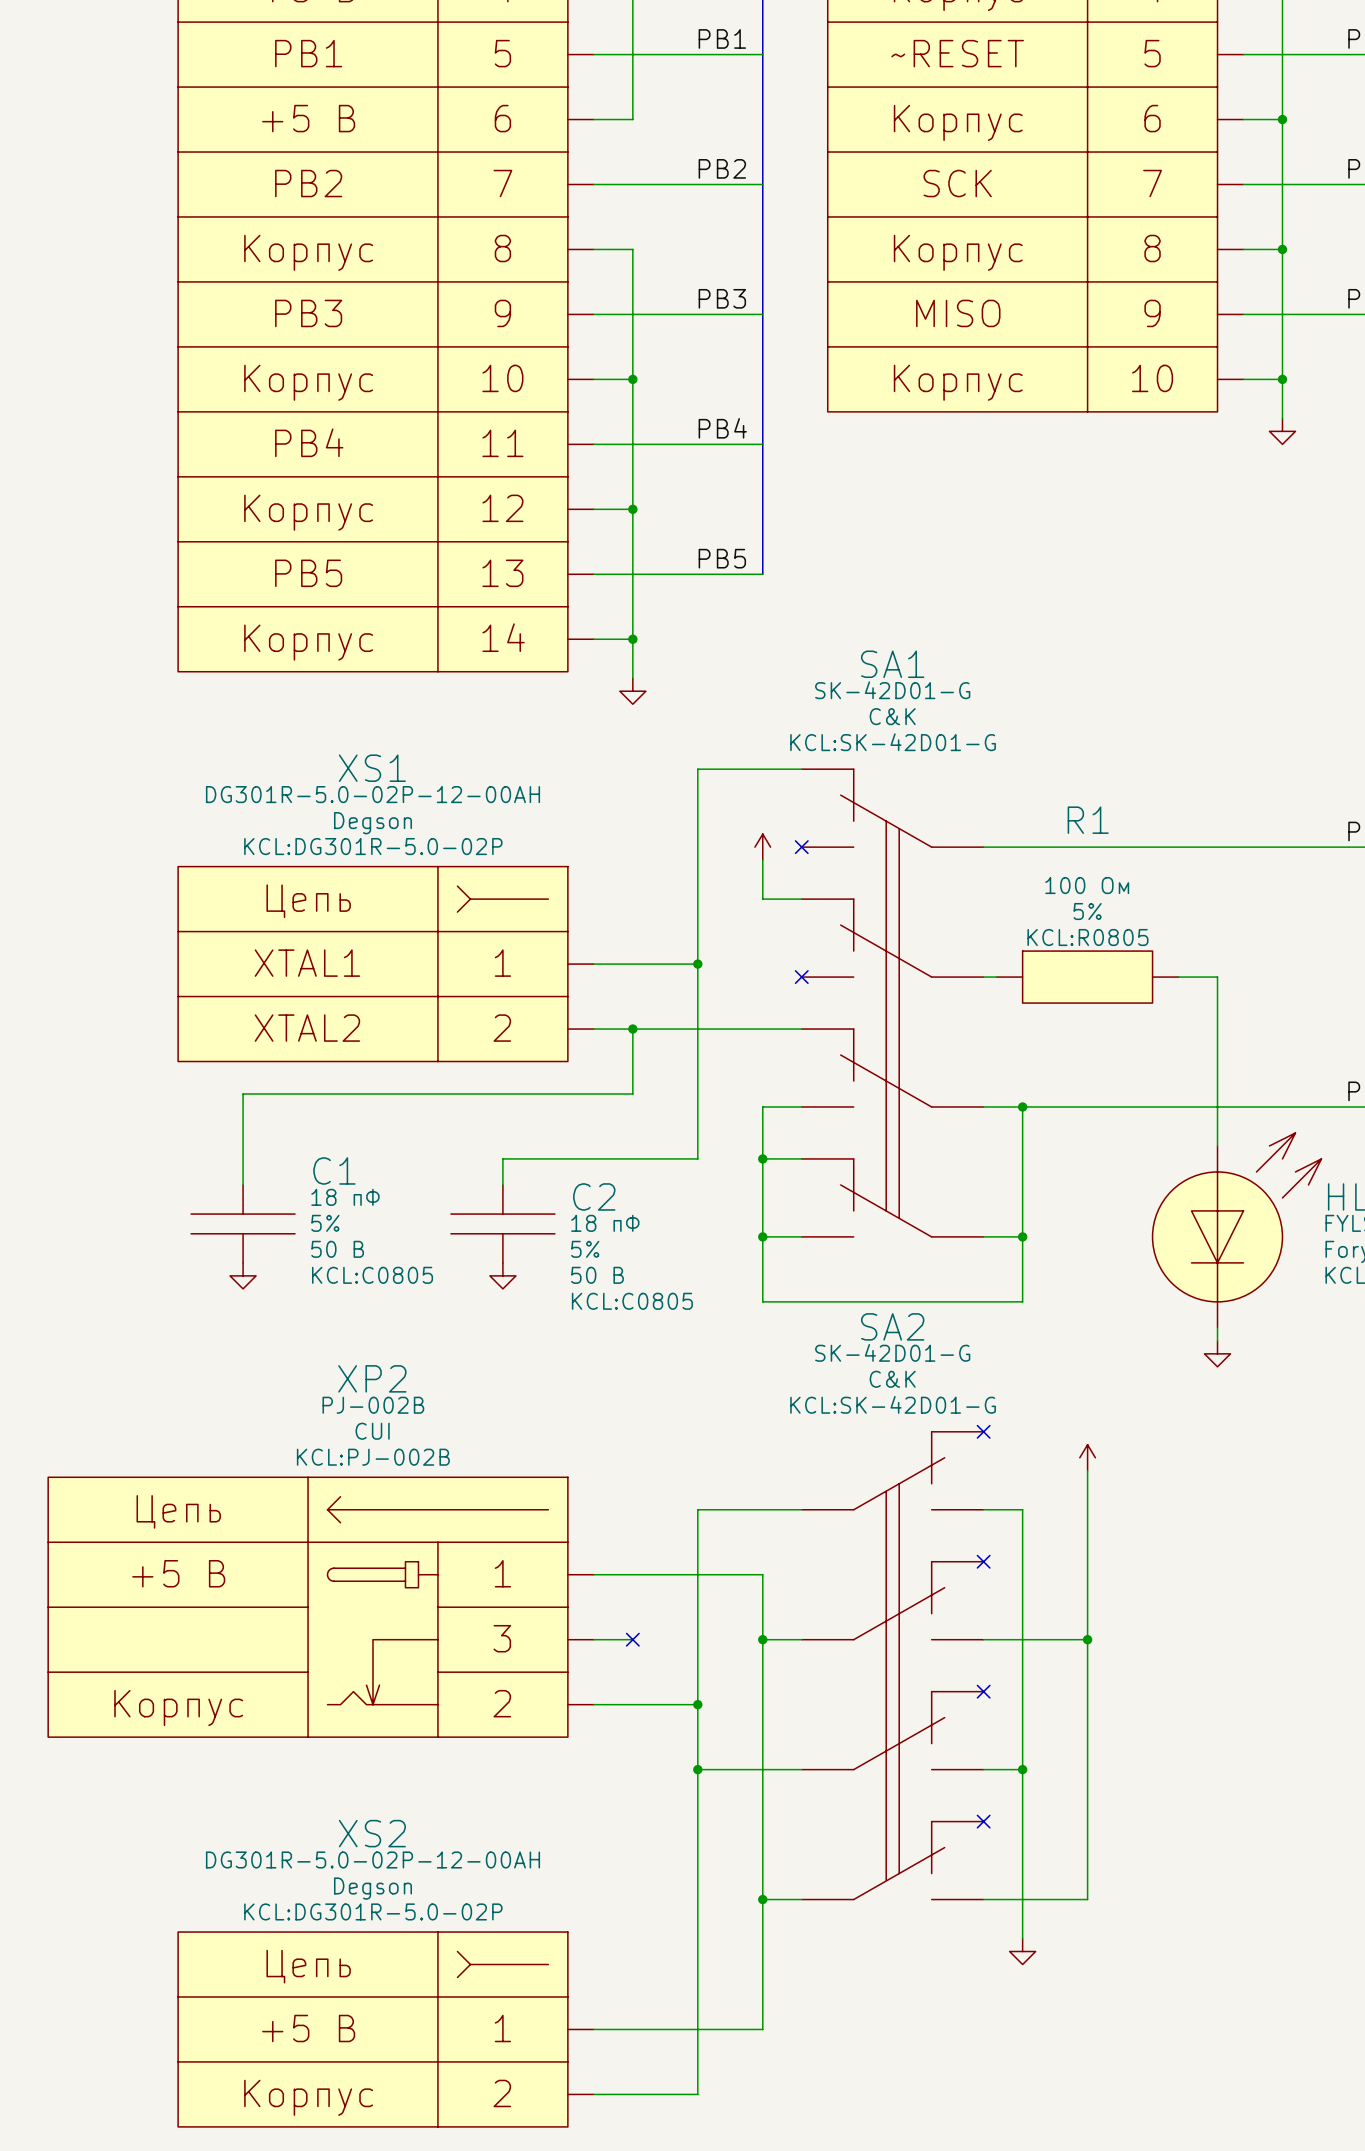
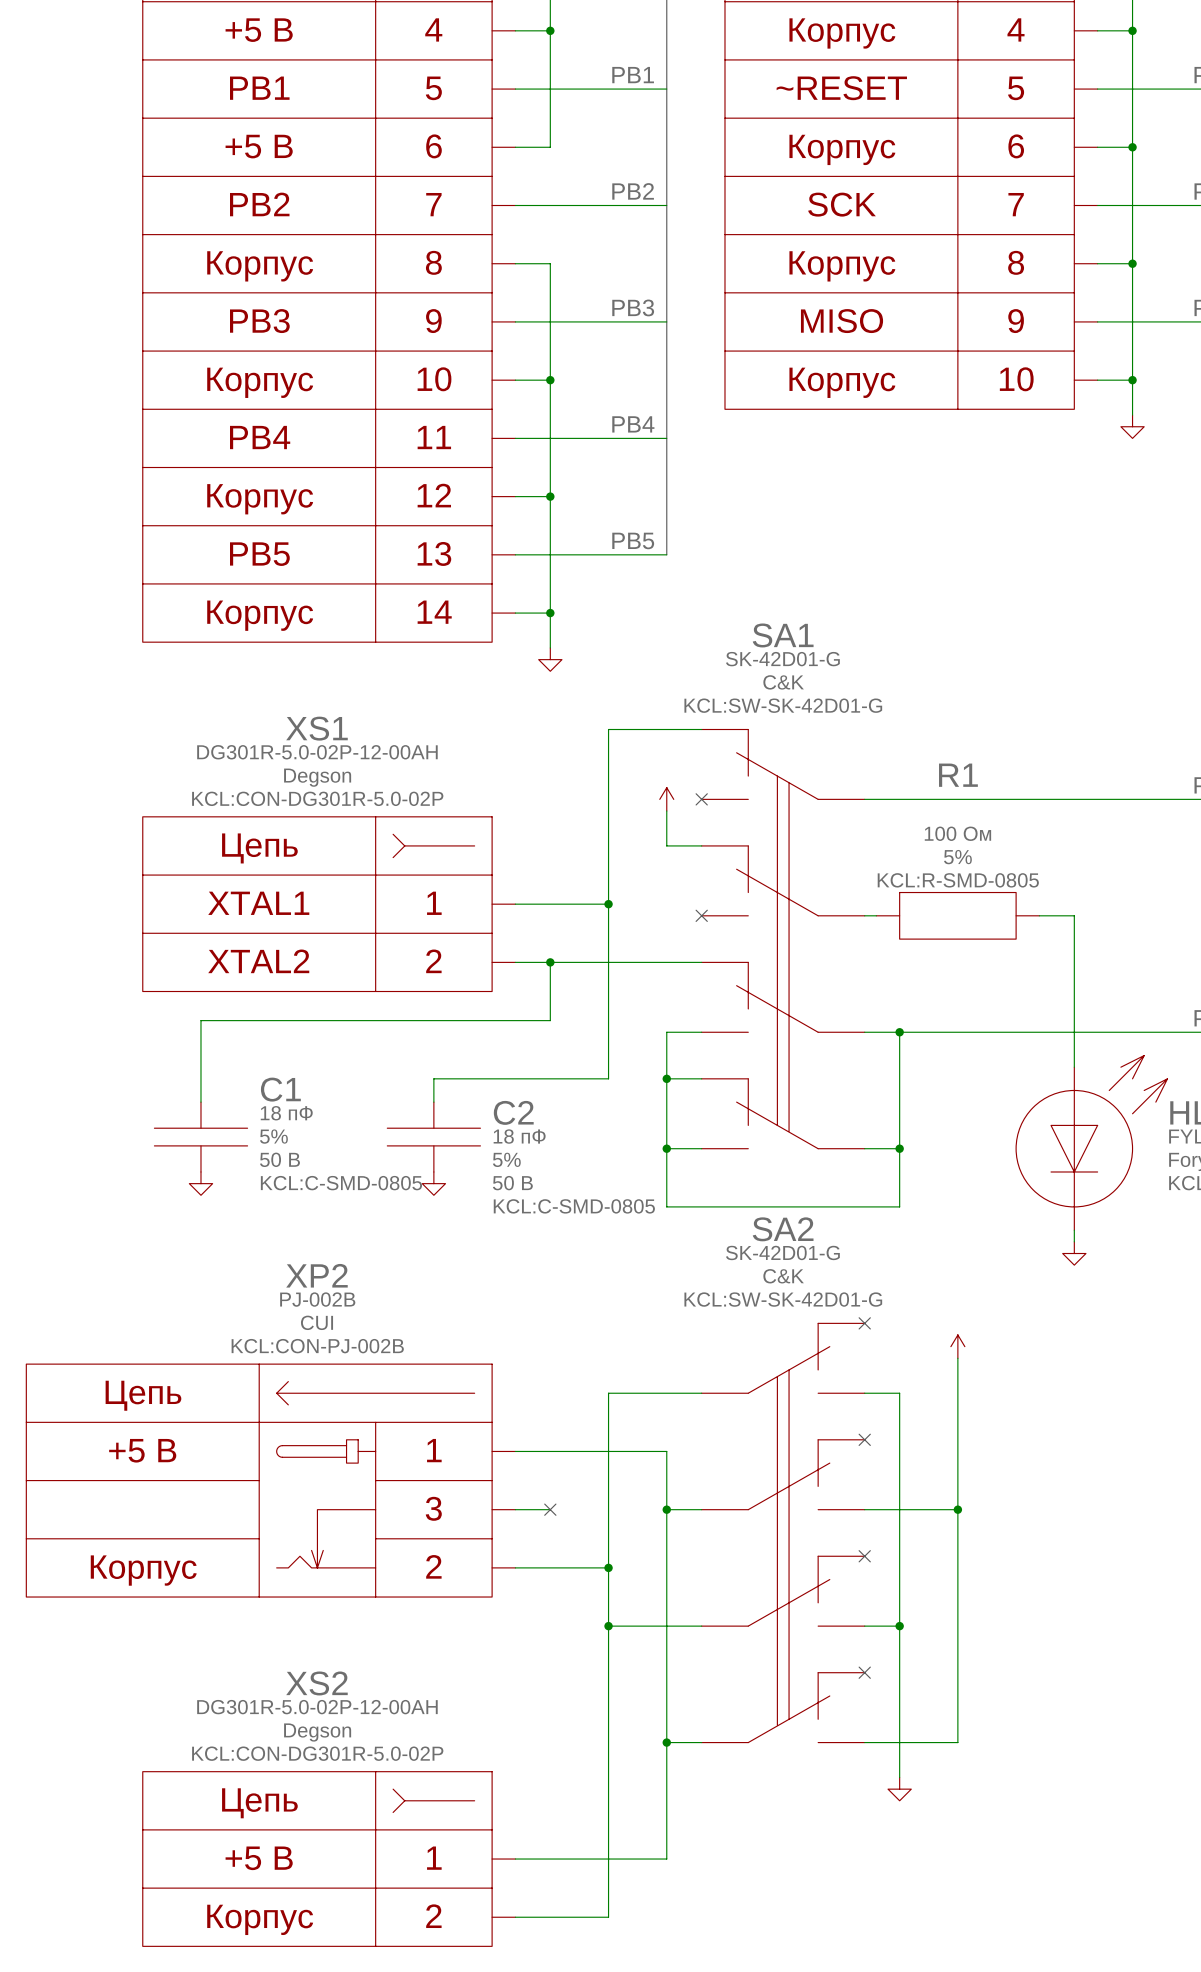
SA1 text: KCL:SK-42D01-G (893, 742) -> KCL:SW-SK-42D01-G (783, 705)
XS1 text: KCL:DG301R-5.0-02P (373, 846) -> KCL:CON-DG301R-5.0-02P (317, 798)
R1 text: KCL:R0805 (1087, 937) -> KCL:R-SMD-0805 (958, 880)
C1 text: KCL:C0805 (372, 1275) -> KCL:C-SMD-0805 (341, 1183)
C2 text: KCL:C0805 (632, 1301) -> KCL:C-SMD-0805 (574, 1206)
SA2 text: KCL:SK-42D01-G (893, 1404) -> KCL:SW-SK-42D01-G (783, 1299)
XP2 text: KCL:PJ-002B (373, 1457) -> KCL:CON-PJ-002B (317, 1346)
XS2 text: KCL:DG301R-5.0-02P (373, 1911) -> KCL:CON-DG301R-5.0-02P (317, 1753)

